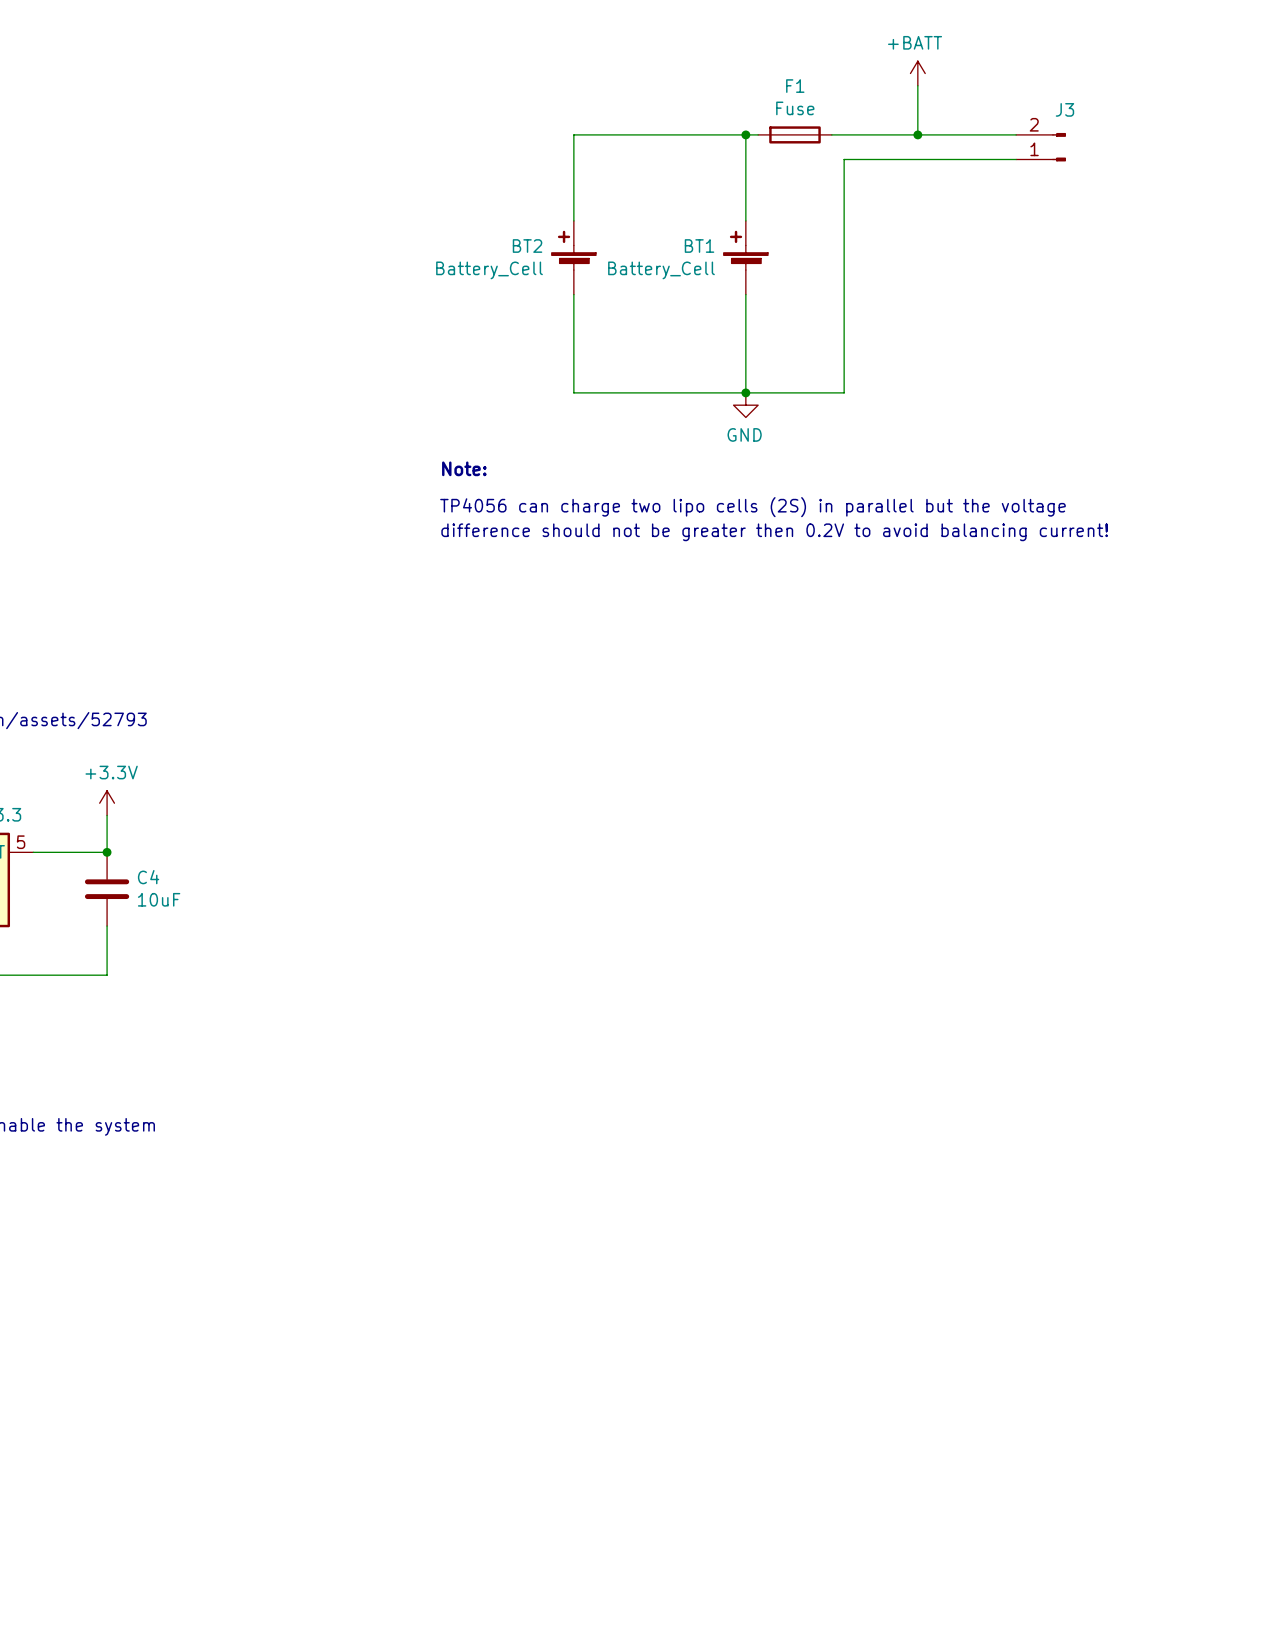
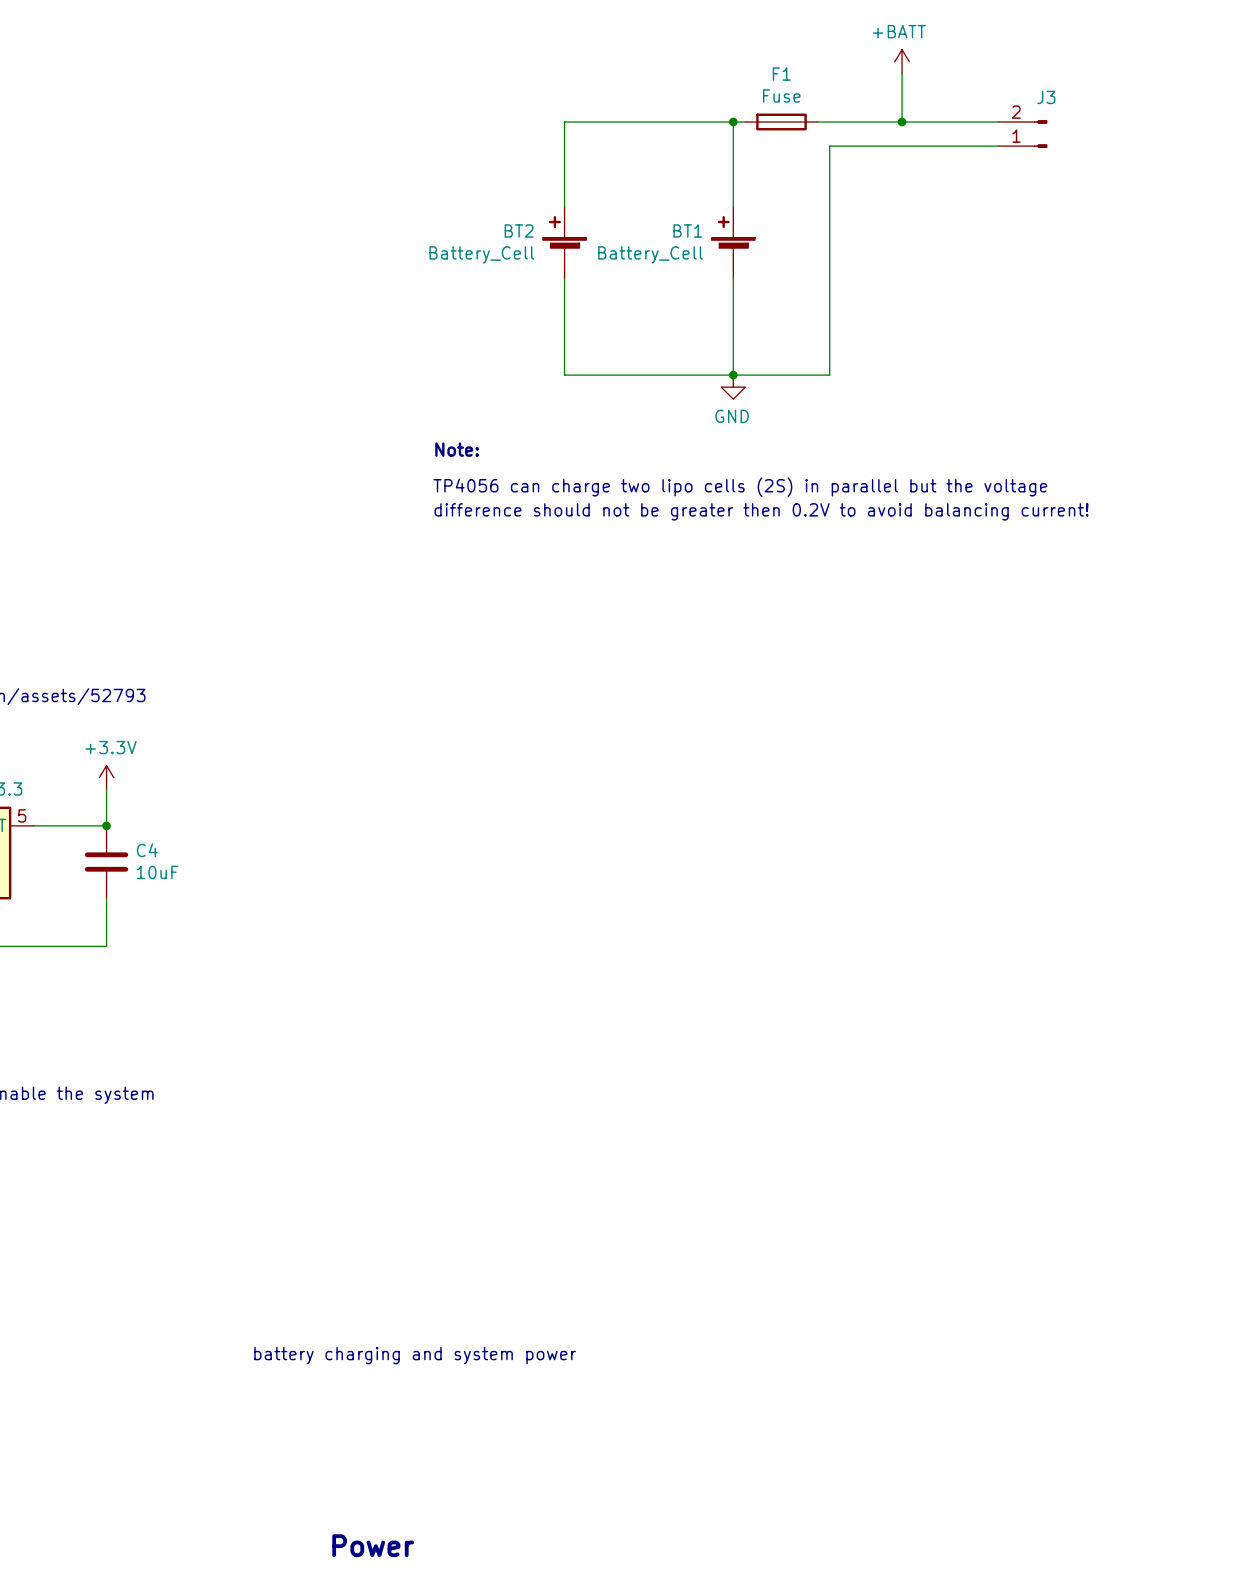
text: none -> battery charging and system power (415, 1355)
text: none -> Power (373, 1545)

